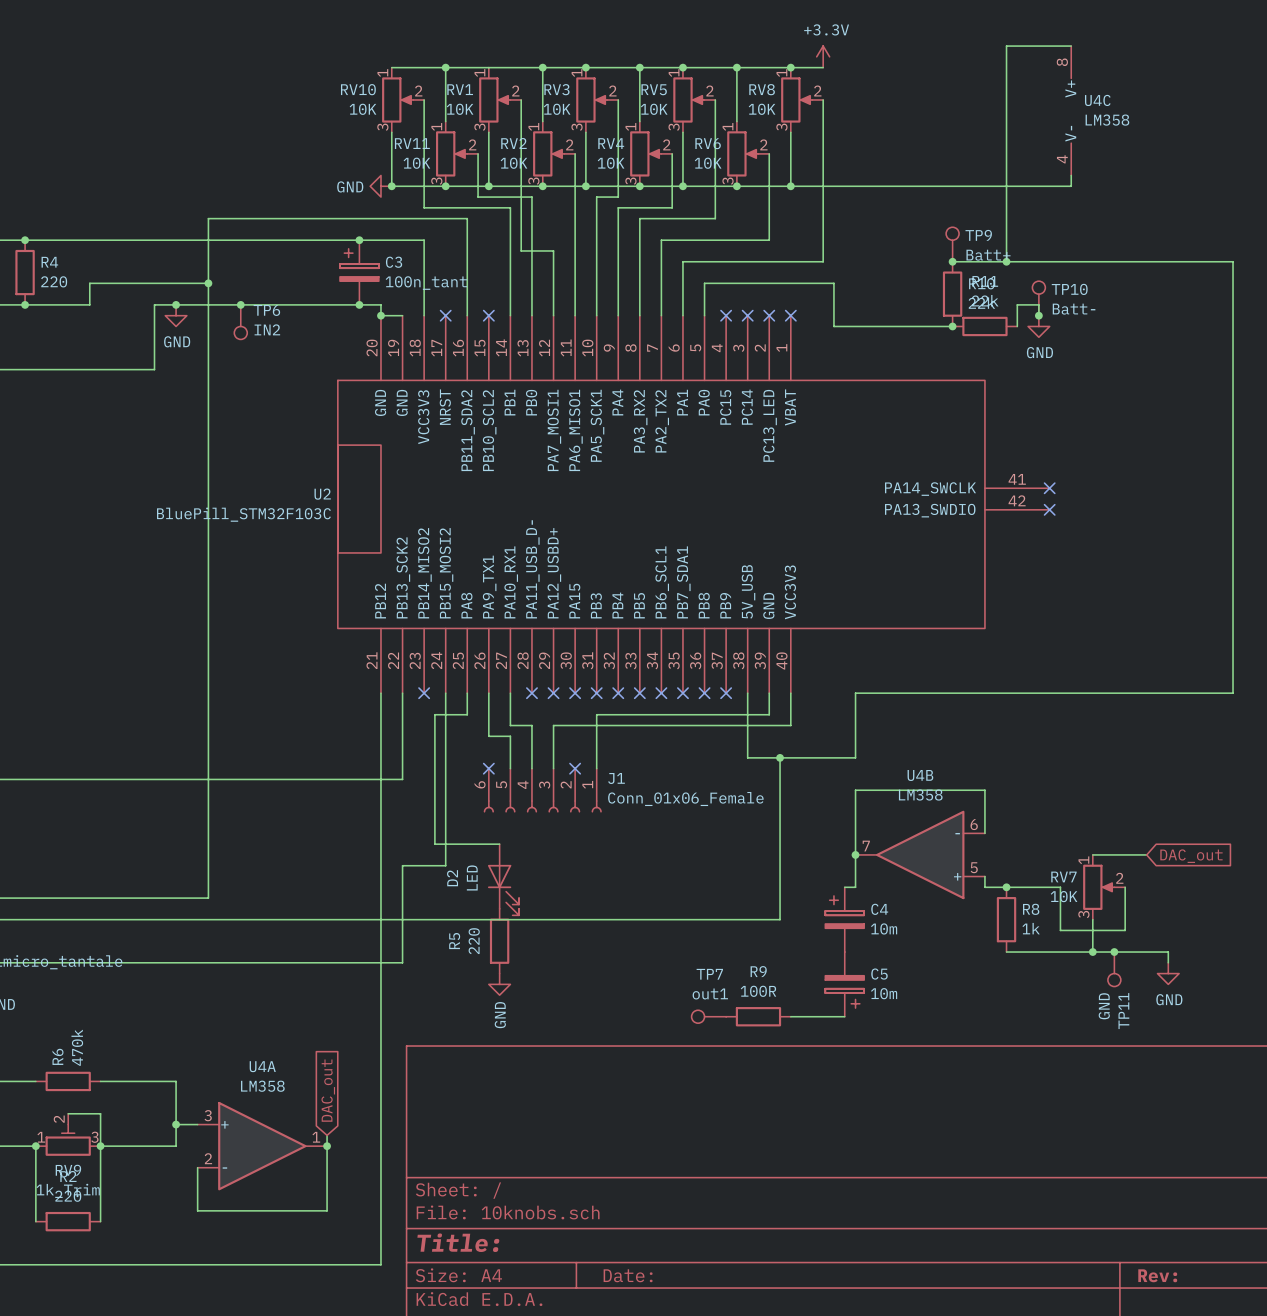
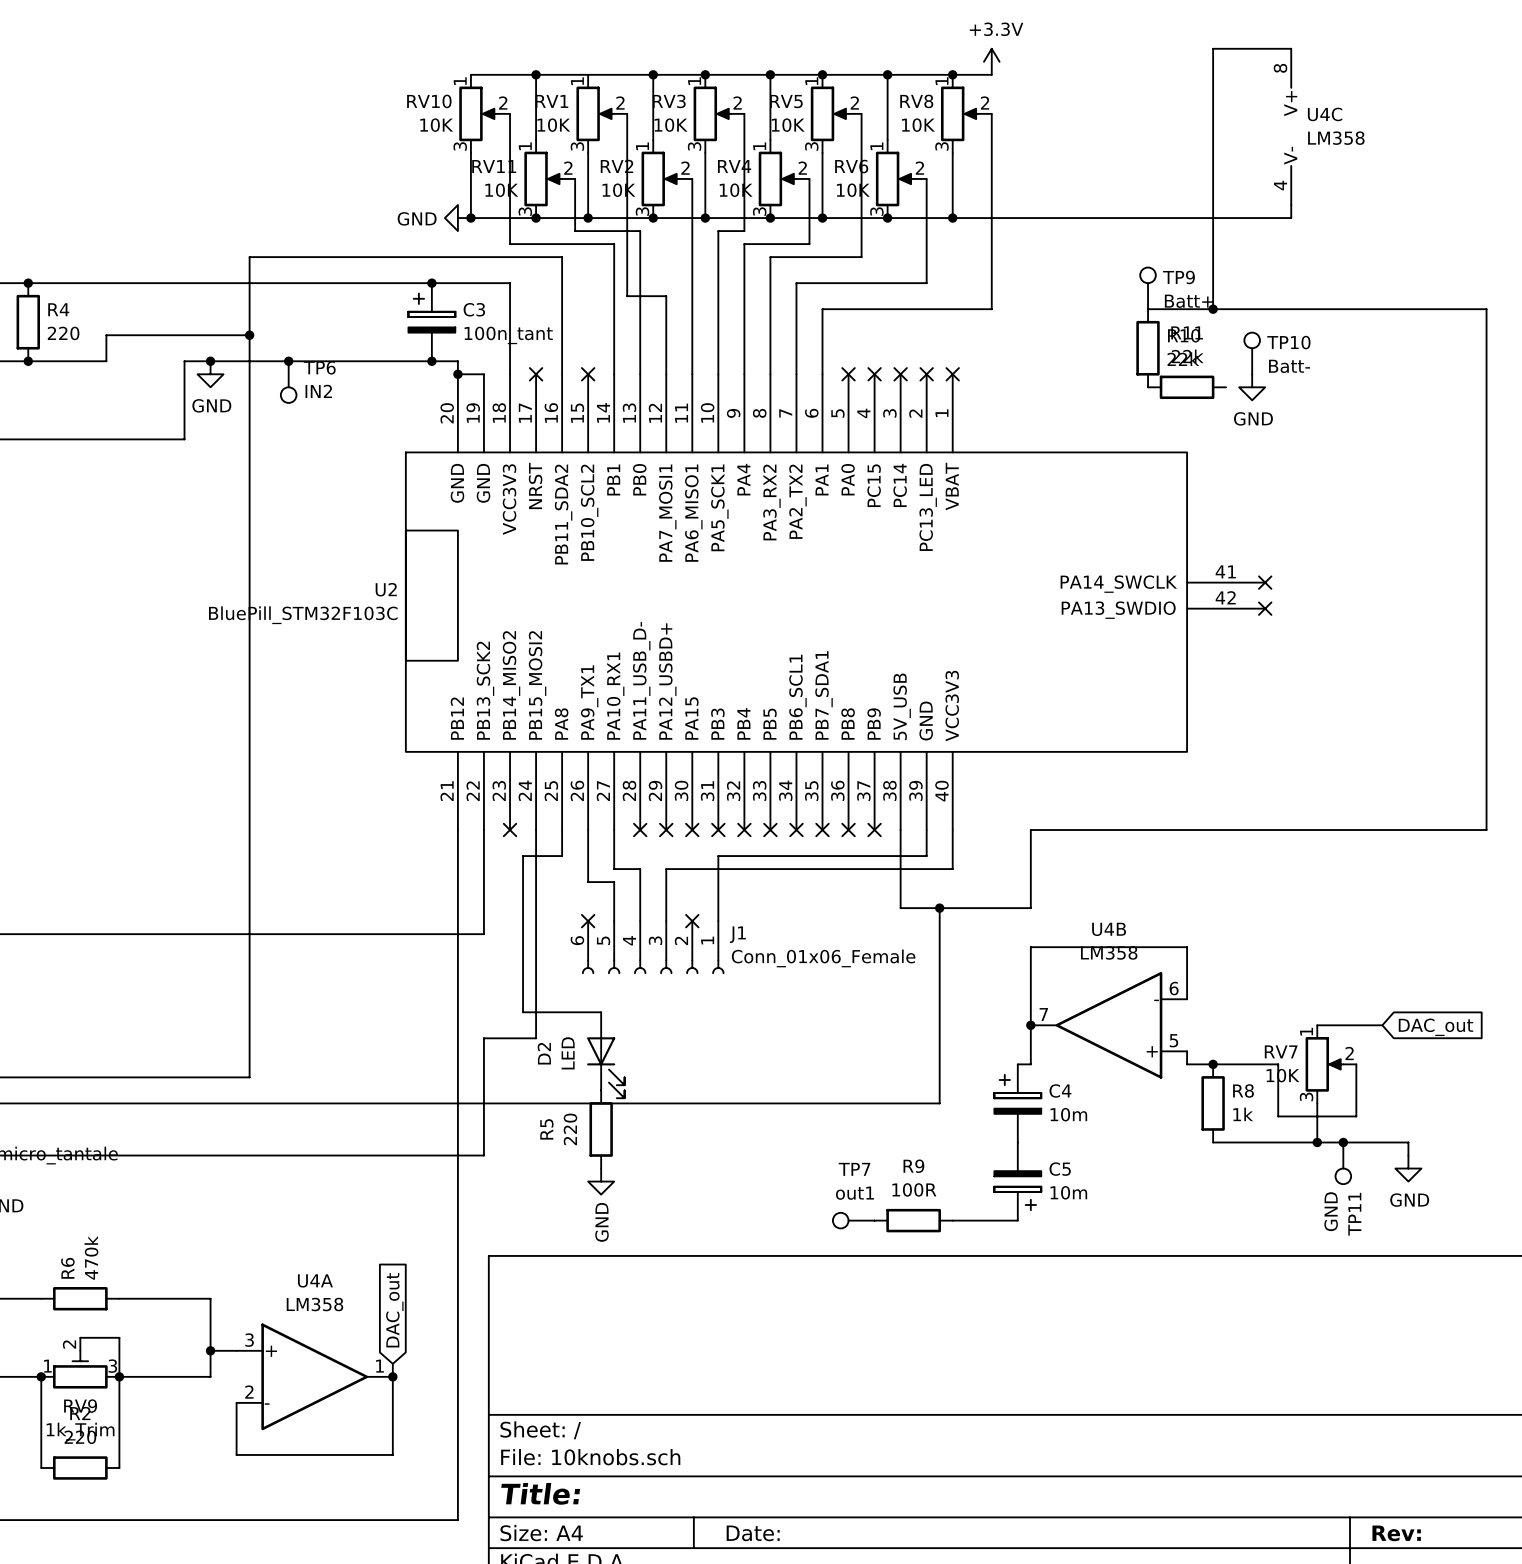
junction: (952, 261) -> none
wire: (704, 315) (704, 283) (833, 283) (833, 326) (952, 326) -> none
no-connect mark: none -> (848, 374)
wire: (1038, 315) (1038, 304) (1017, 304) (1017, 326) -> none
junction: (1038, 315) -> none
junction: (952, 326) -> none

